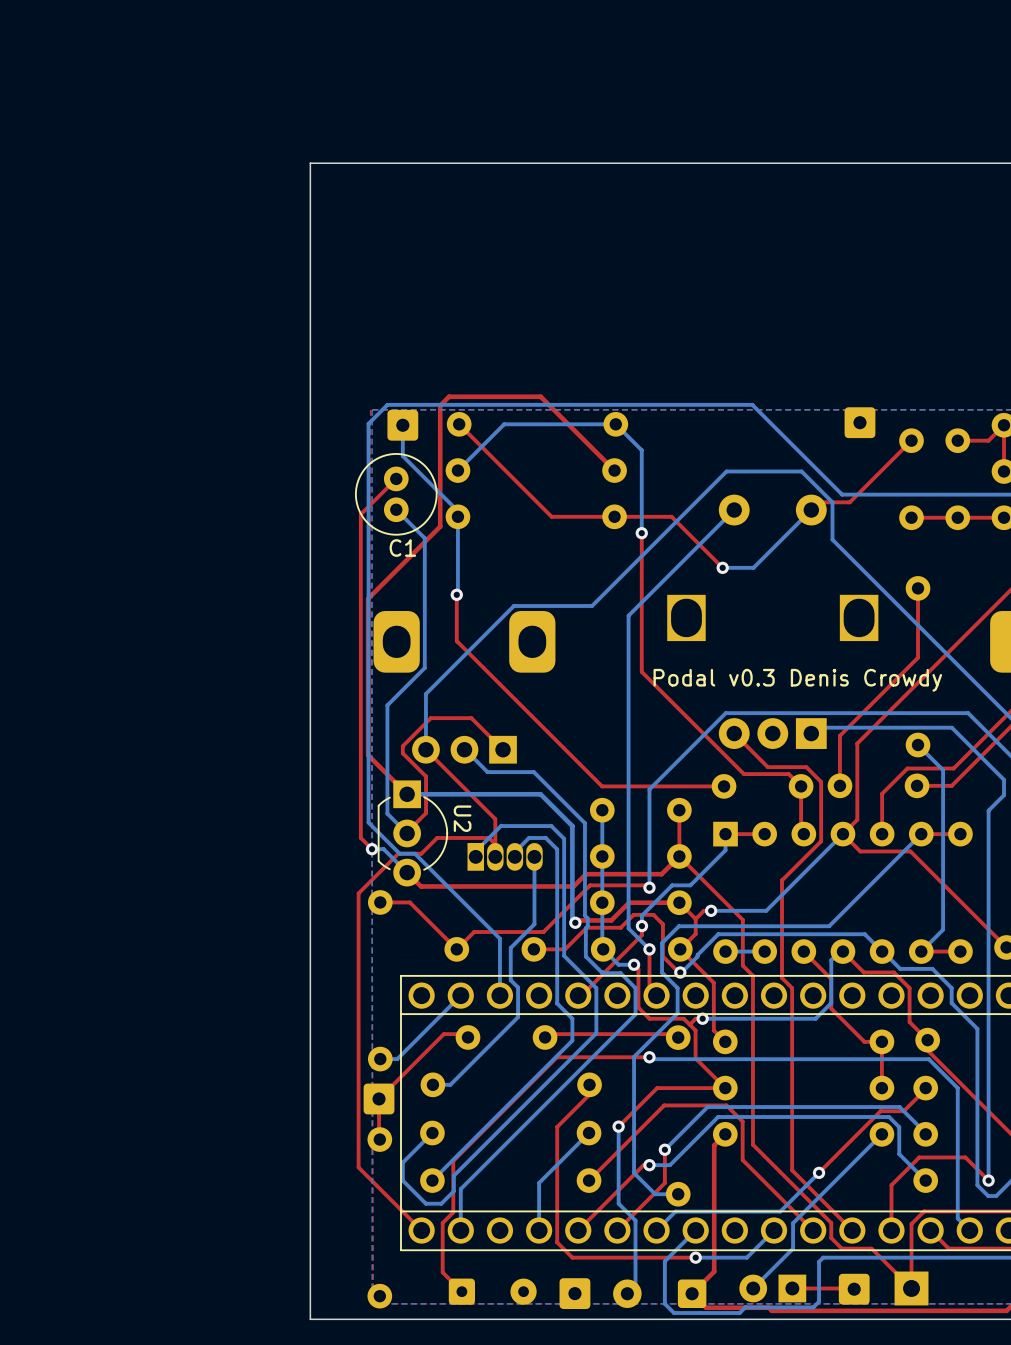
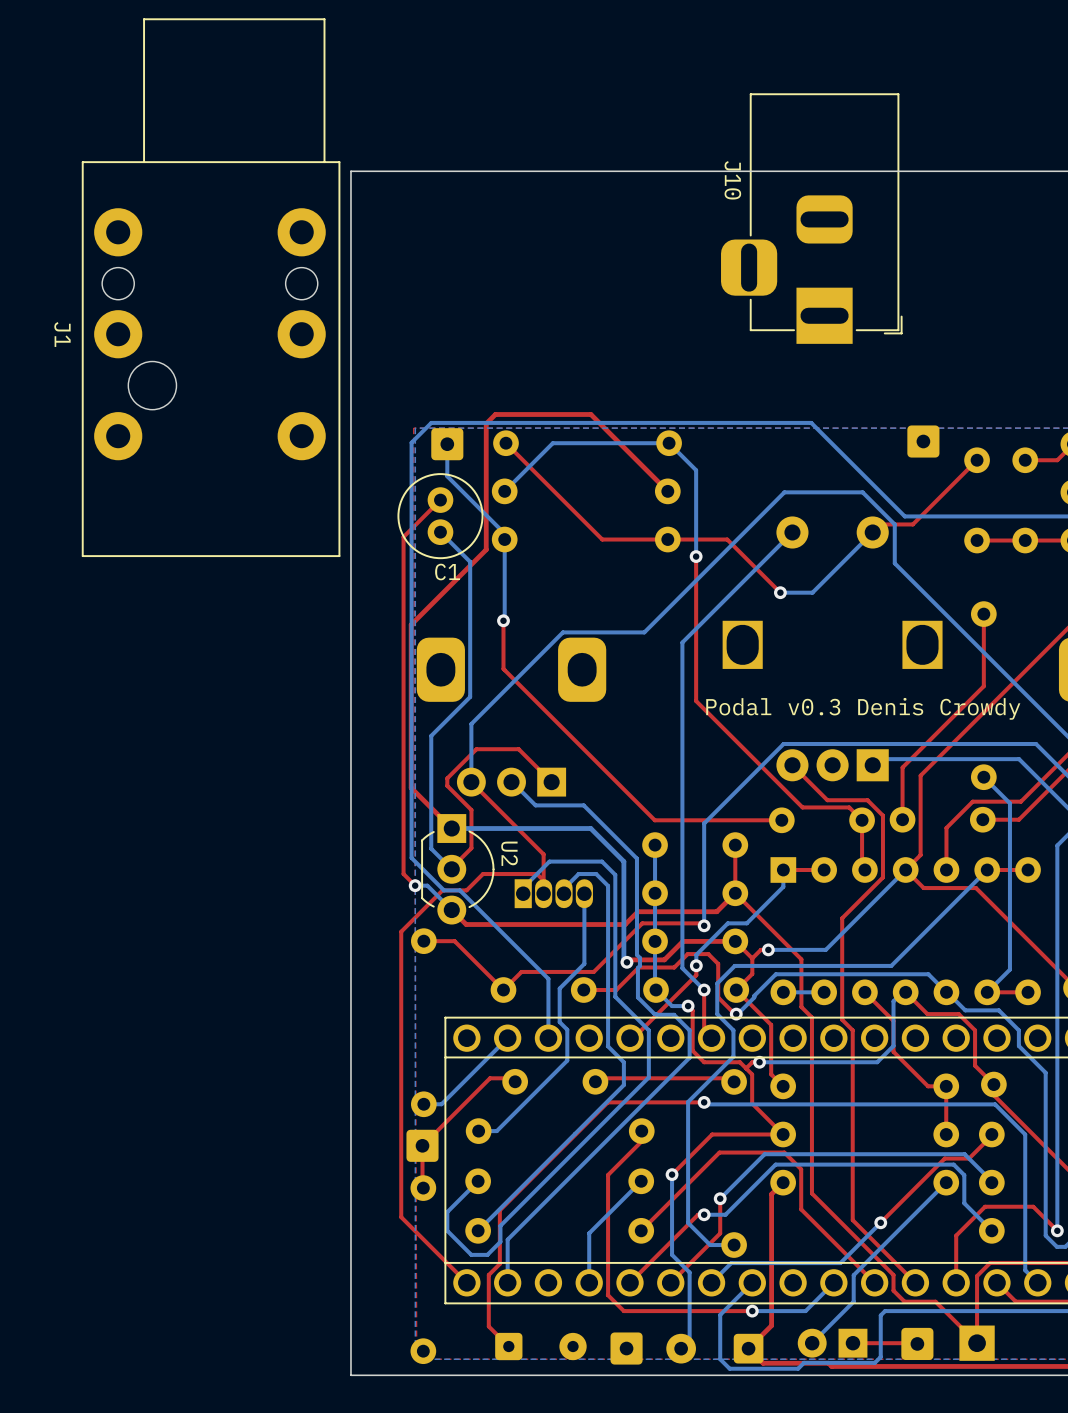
J10: none -> (811, 218)
J1: none -> (211, 287)

